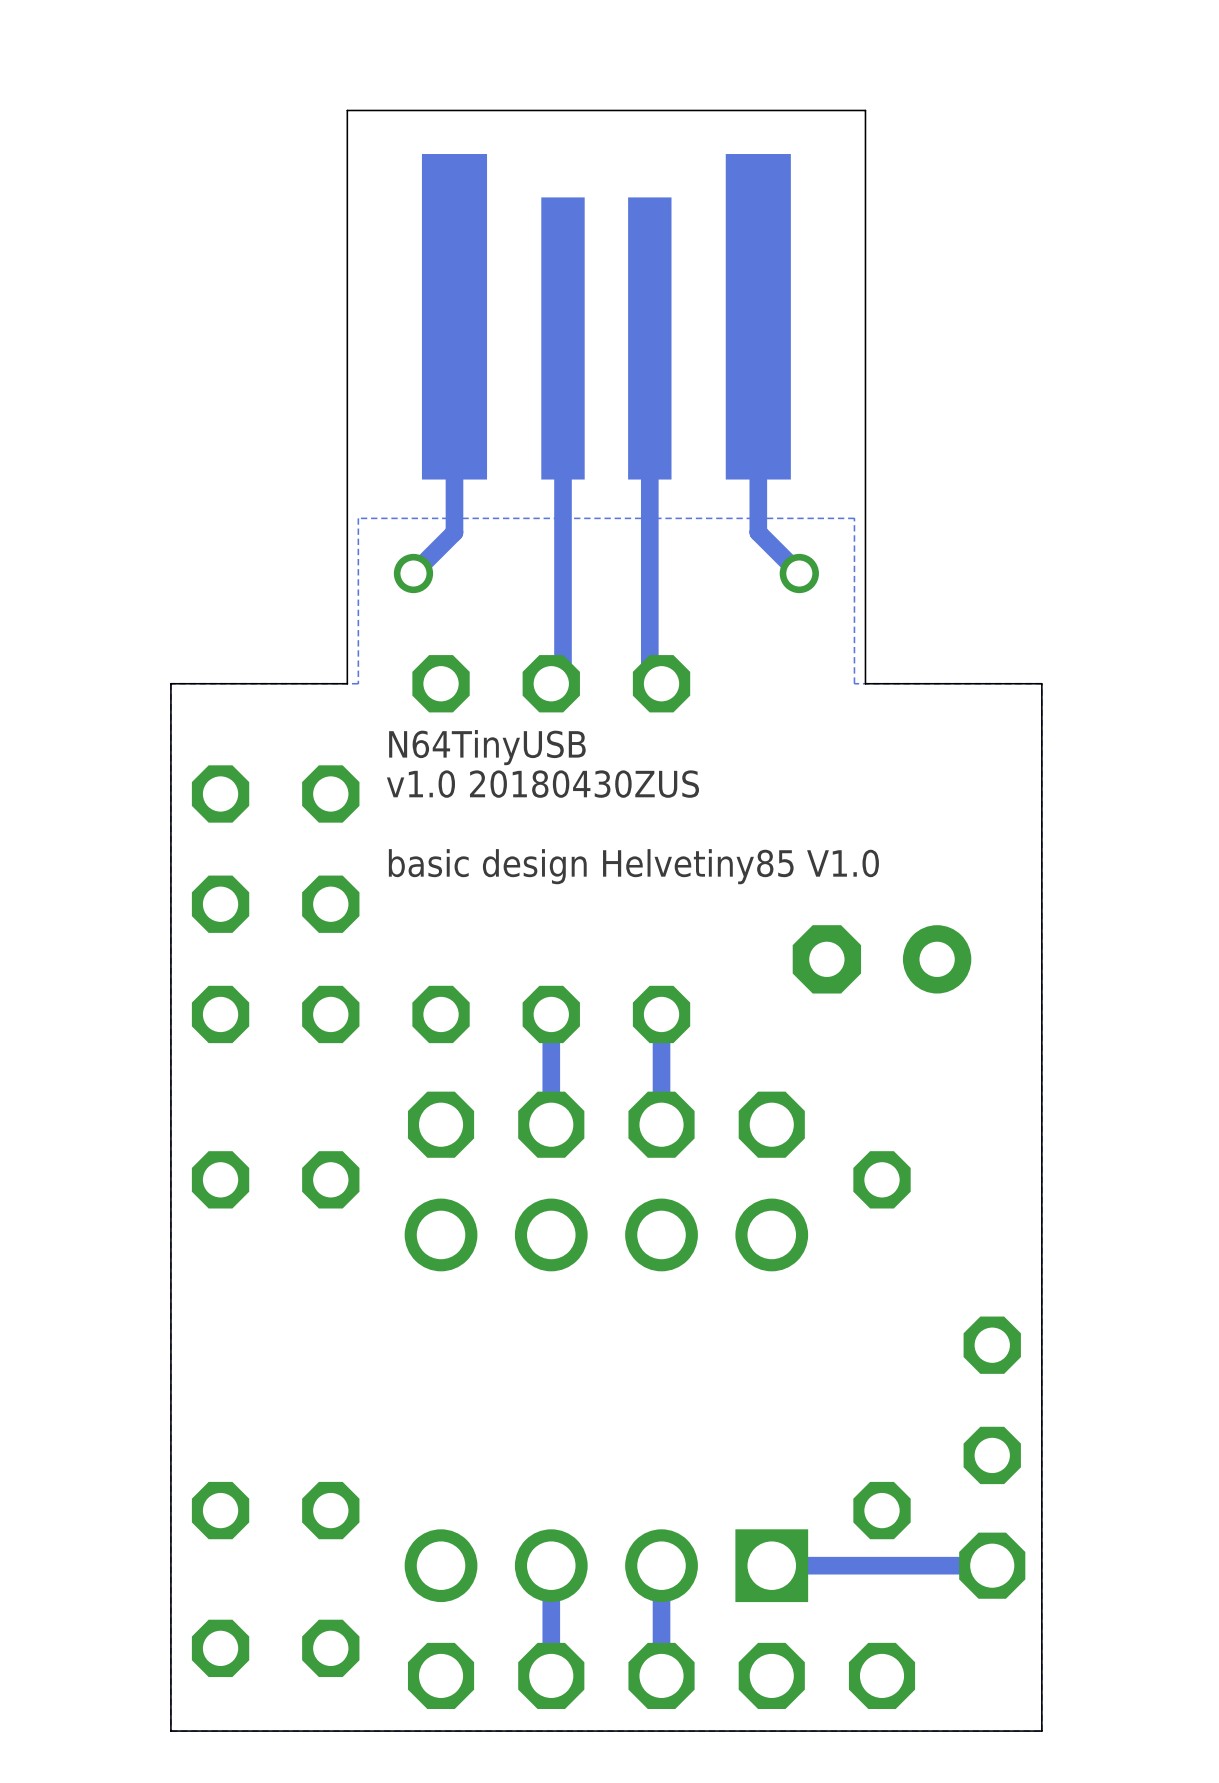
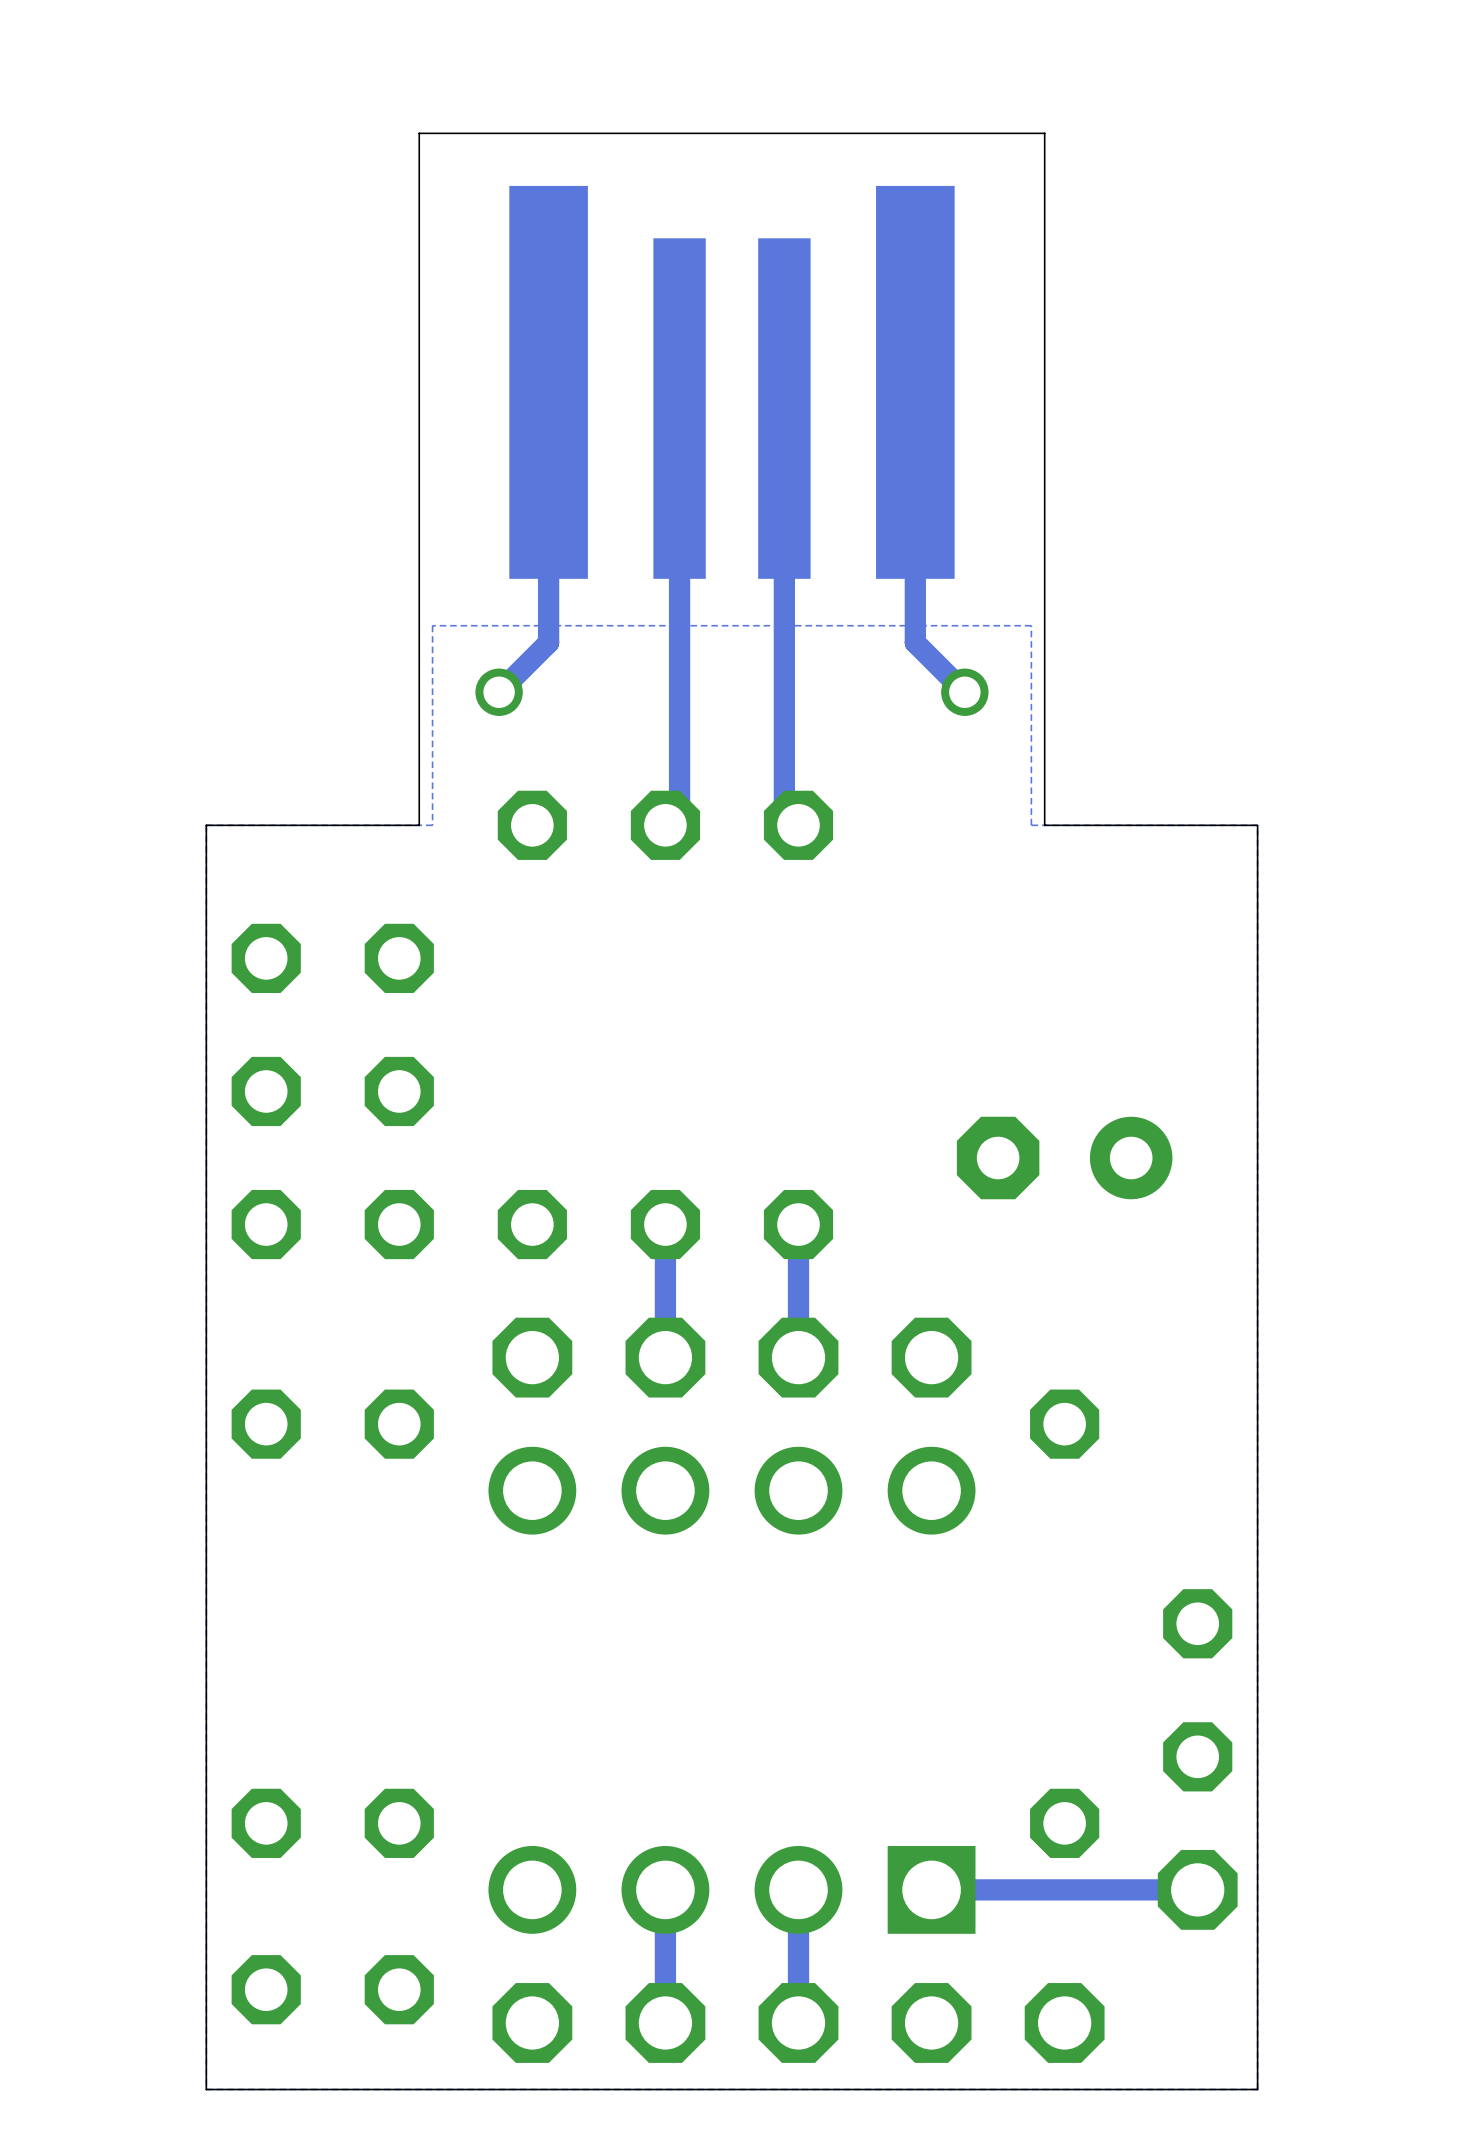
text: N64TinyUSB (487, 747) -> none
text: v1.0 20180430ZUS (542, 784) -> none
text: basic design Helvetiny85 V1.0 (633, 866) -> none

